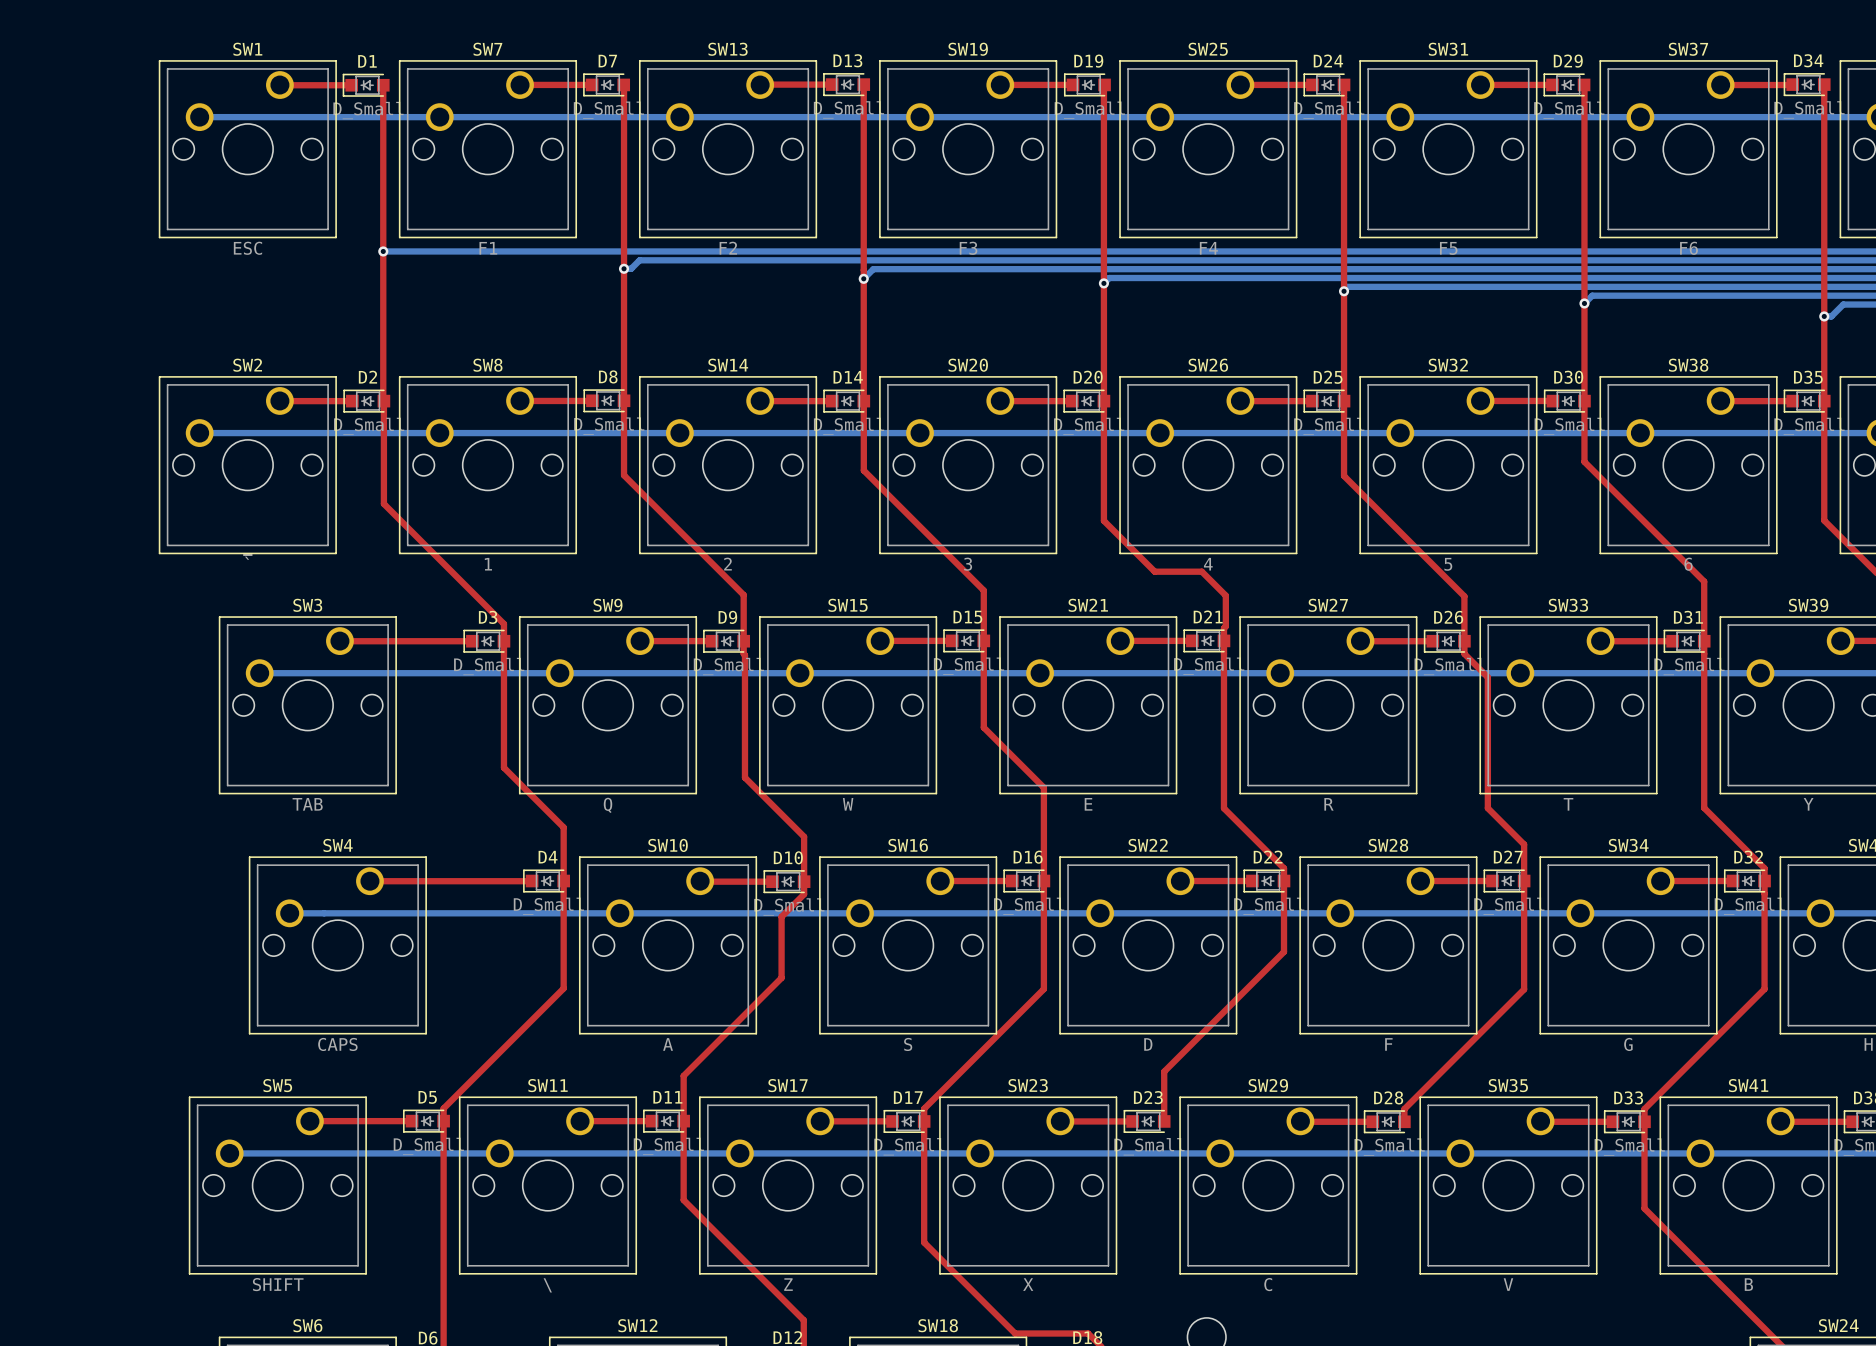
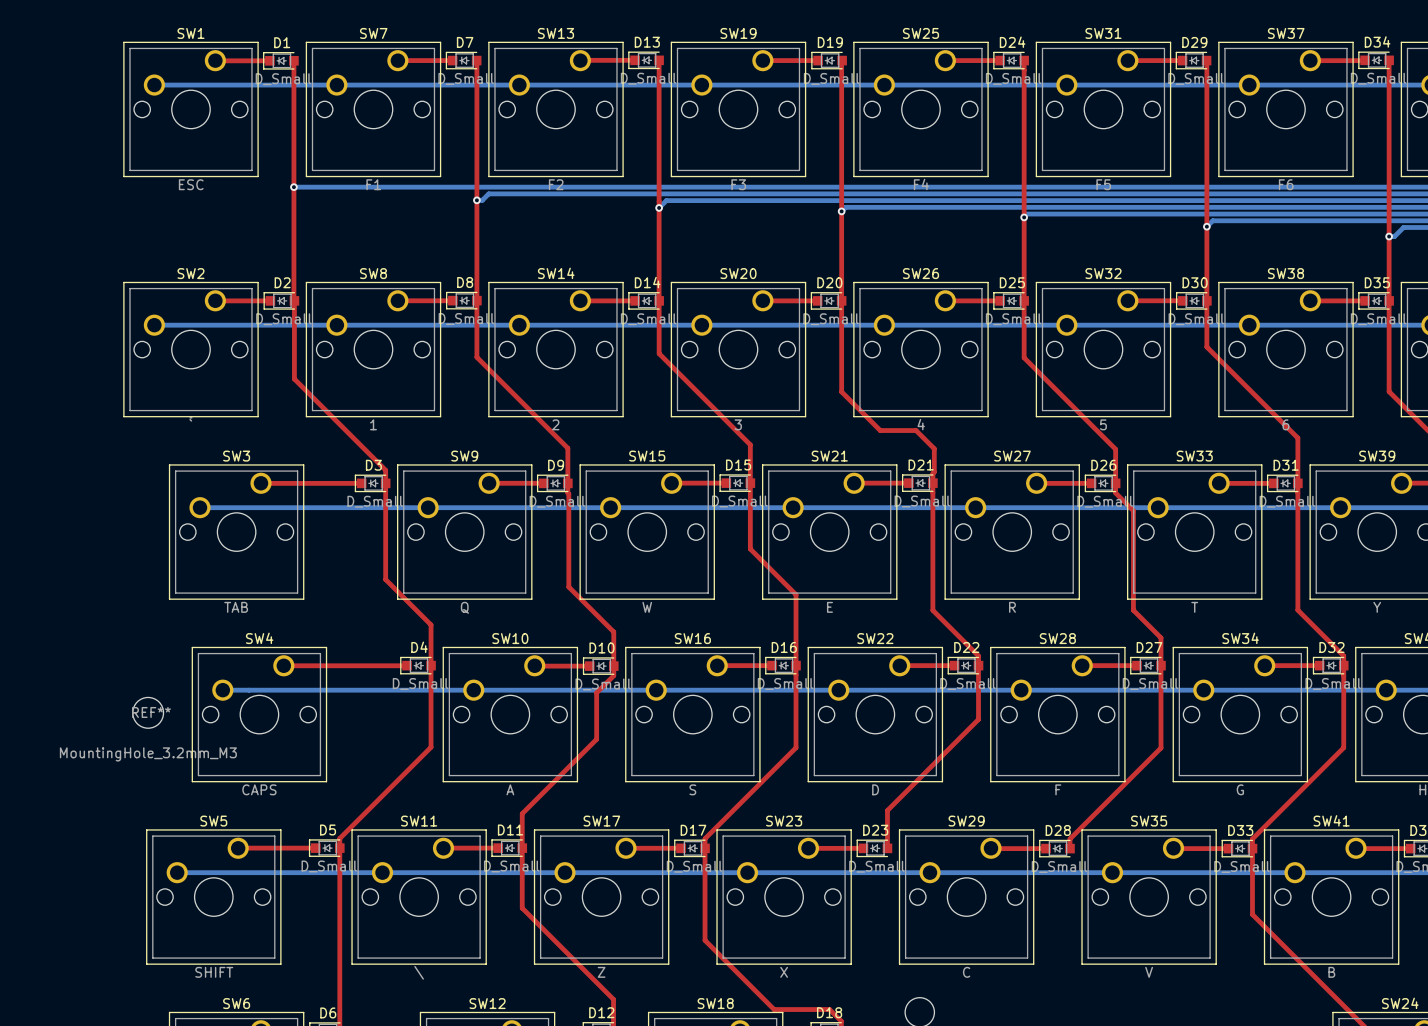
REF**: none -> MountingHole_3.2mm_M3 (148, 712)

